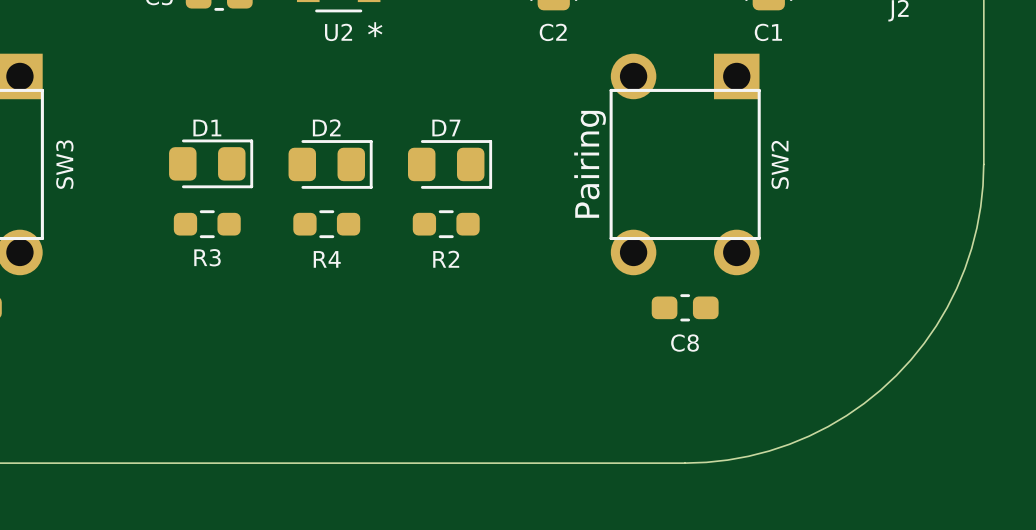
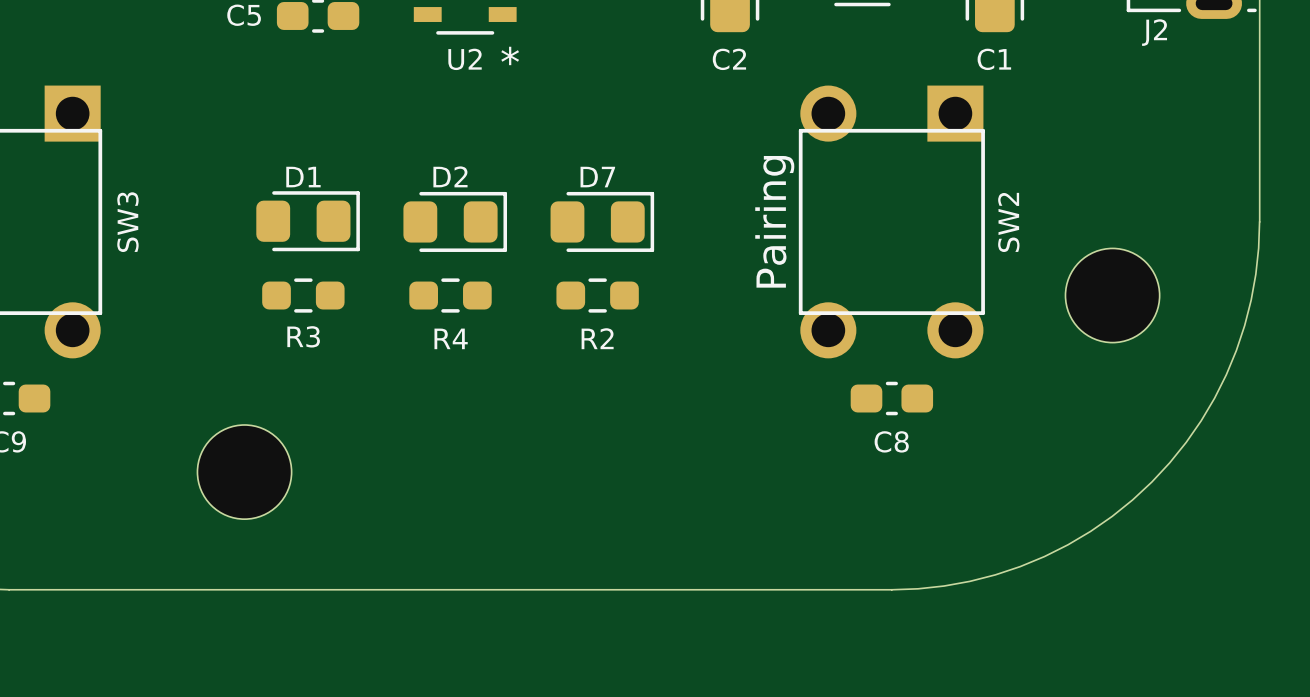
part: none -> (1112, 295)
part: none -> (244, 472)

